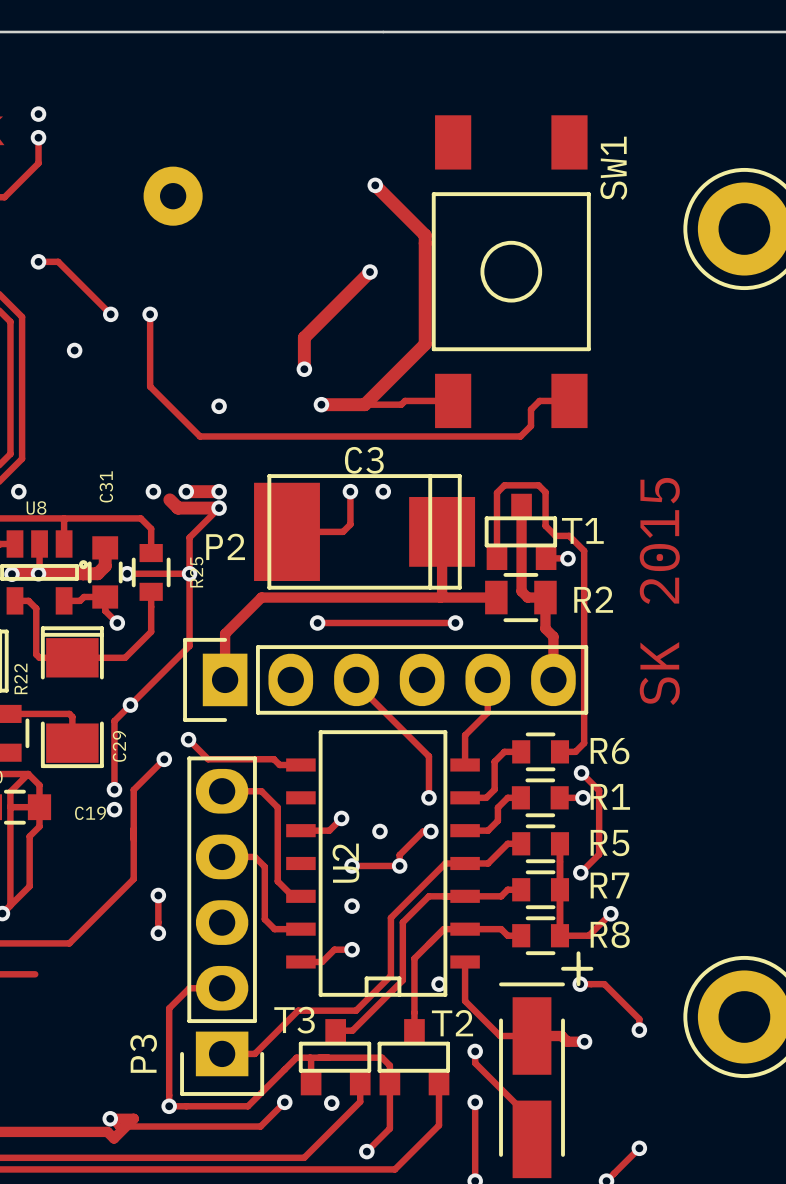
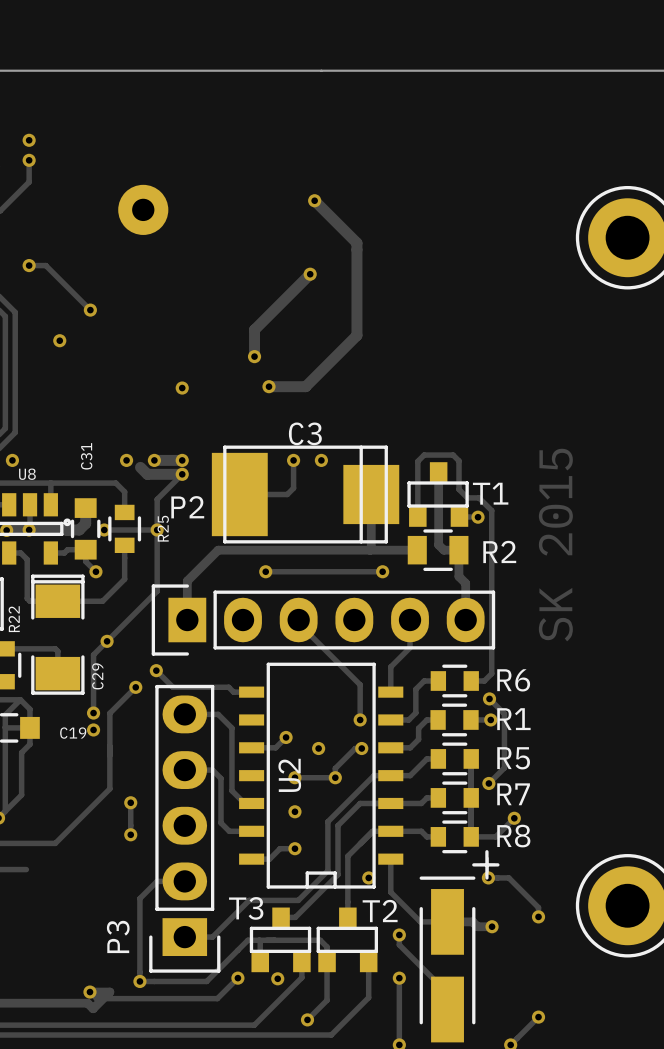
SW1: (511, 271) -> none
track: (150, 314) (150, 386) (200, 436) (520, 436) (531, 426) (531, 409) (539, 400) (569, 400) -> none
via: (150, 314) -> none
track: (453, 400) (405, 400) (401, 404) (321, 404) -> none

